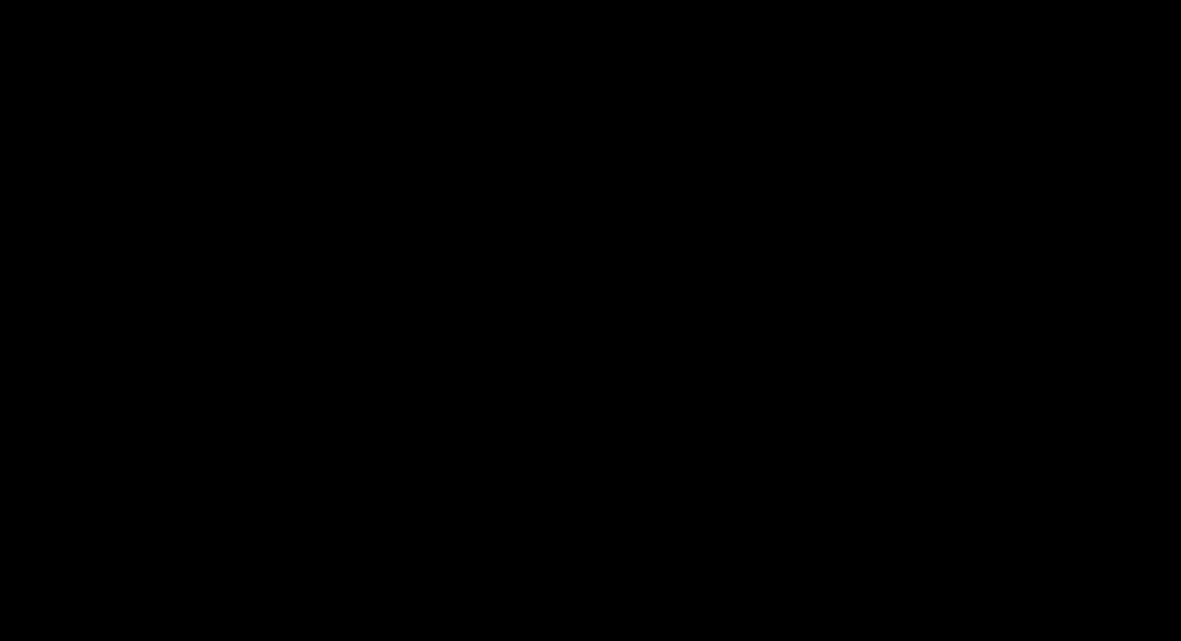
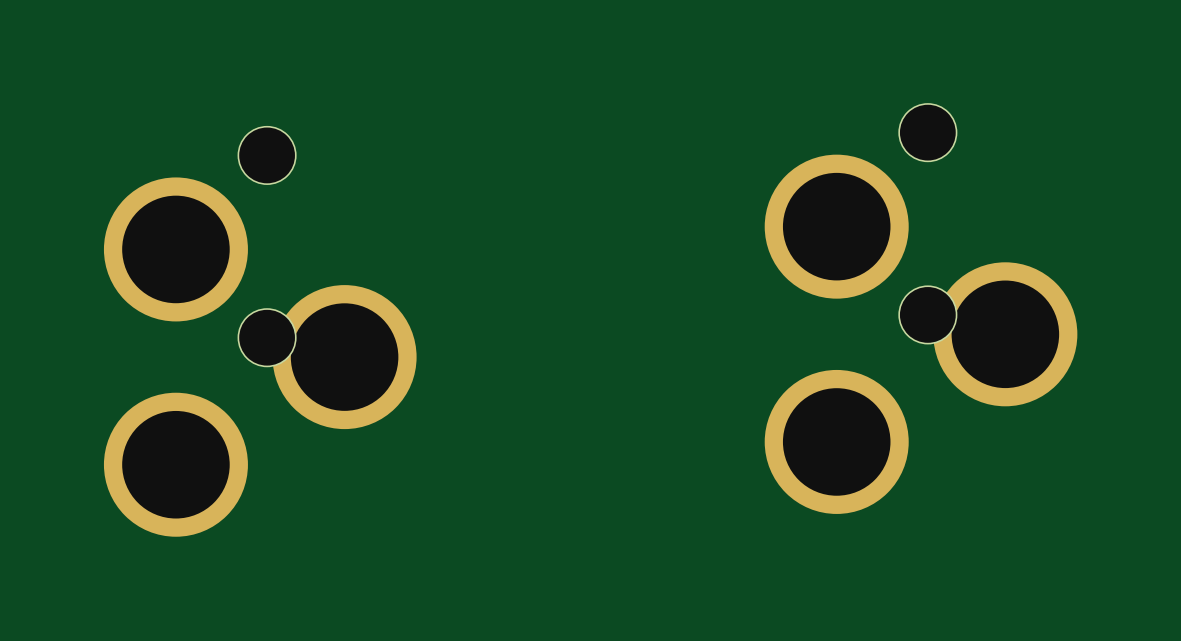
part: none -> (921, 308)
part: none -> (260, 331)

